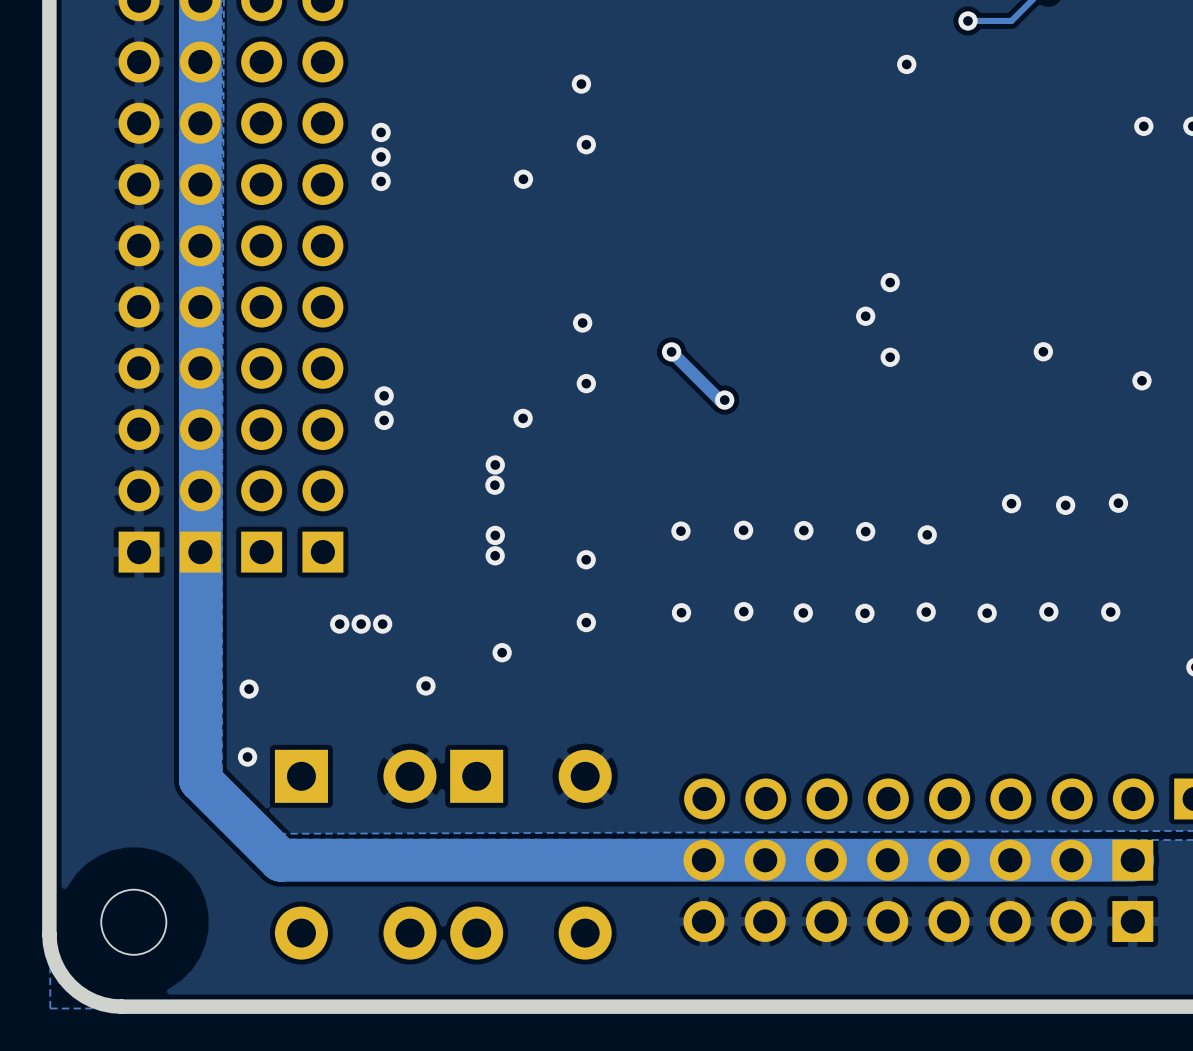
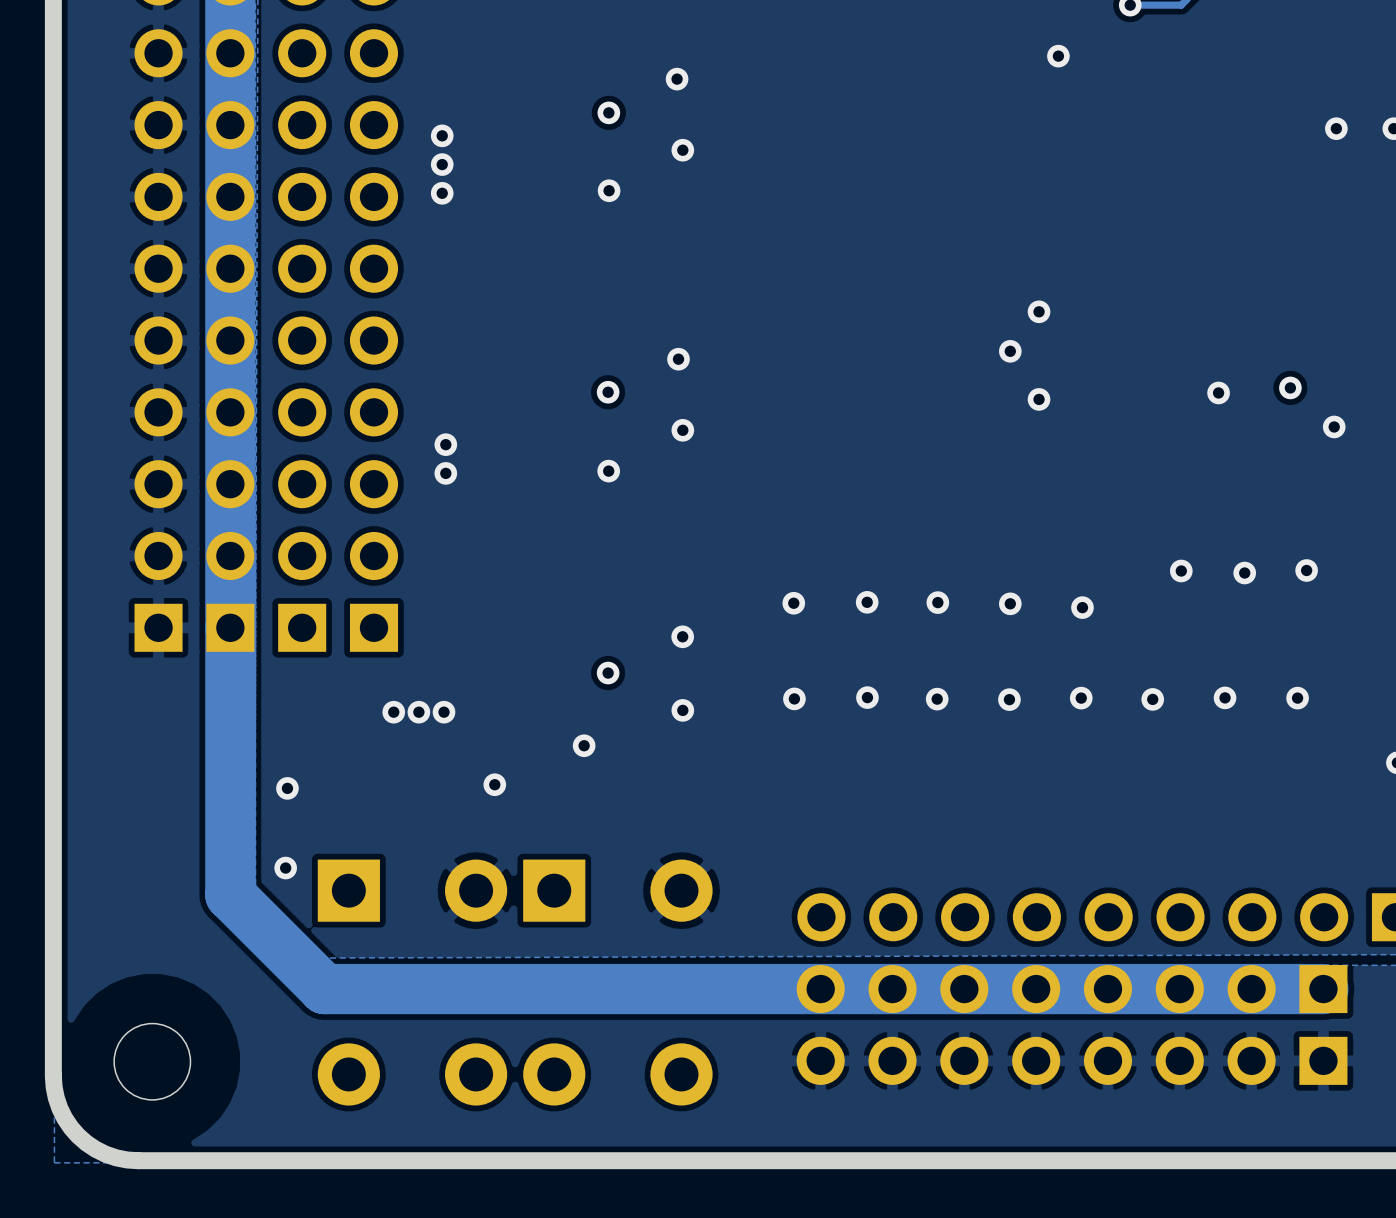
via: none -> (608, 112)
via: none -> (1290, 387)
via: none -> (608, 392)
track: (671, 351) (719, 400) (724, 400) -> none
via: (671, 351) -> none
via: (724, 400) -> none
via: (495, 464) -> none
via: (494, 485) -> none
via: (495, 535) -> none
via: (495, 555) -> none
via: none -> (608, 673)

